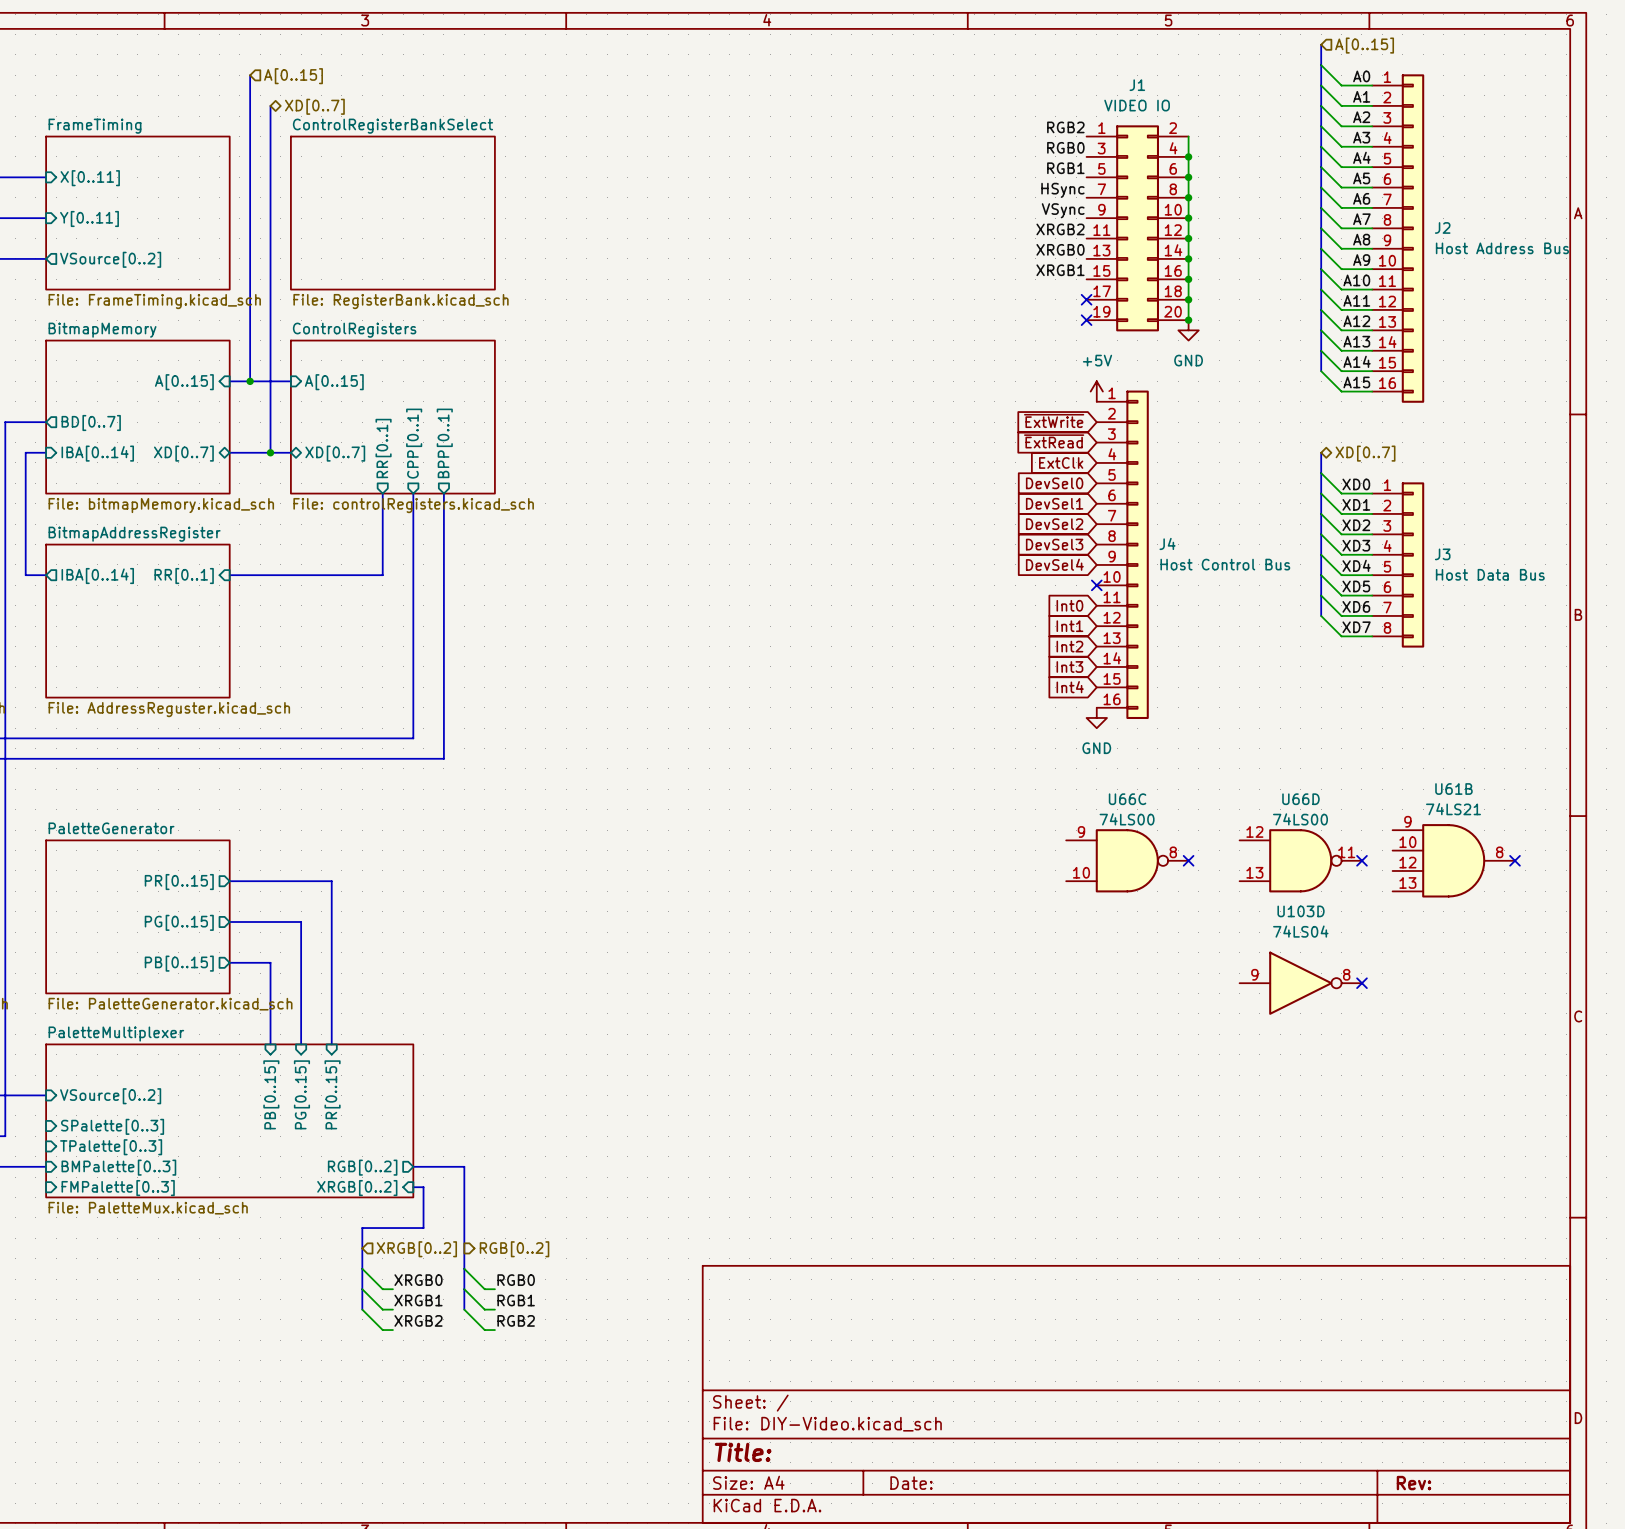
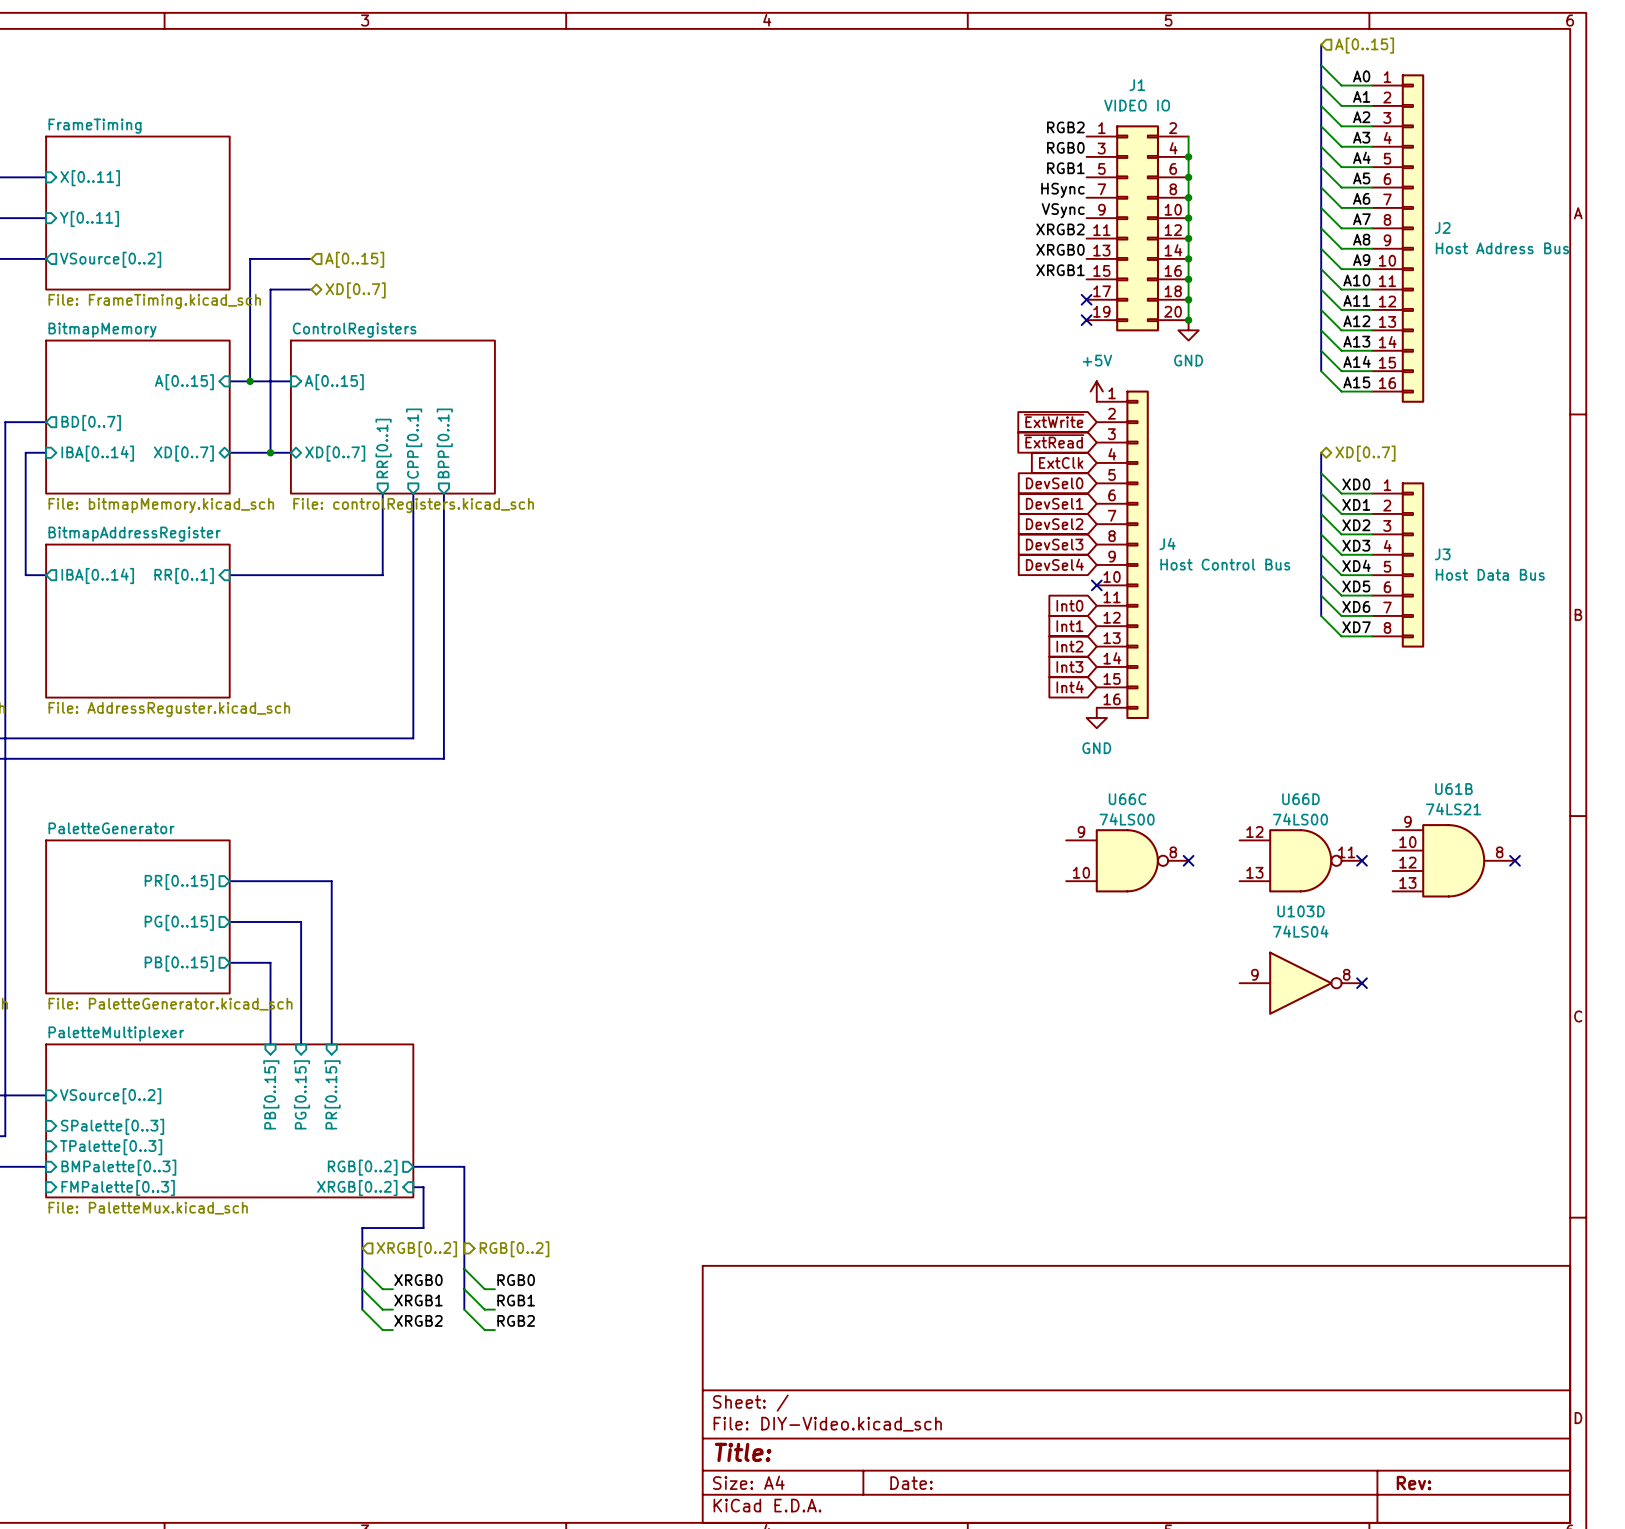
bus: (250, 75) (250, 258) -> (311, 258) (250, 258)
hierarchical label position: A[0..15] (293, 76) -> A[0..15] (354, 259)
bus: (270, 105) (270, 289) -> (311, 289) (270, 289)
hierarchical label position: XD[0..7] (314, 106) -> XD[0..7] (355, 290)
sheet ControlRegisterBankSelect: File: RegisterBank.kicad_sch (392, 213) -> none

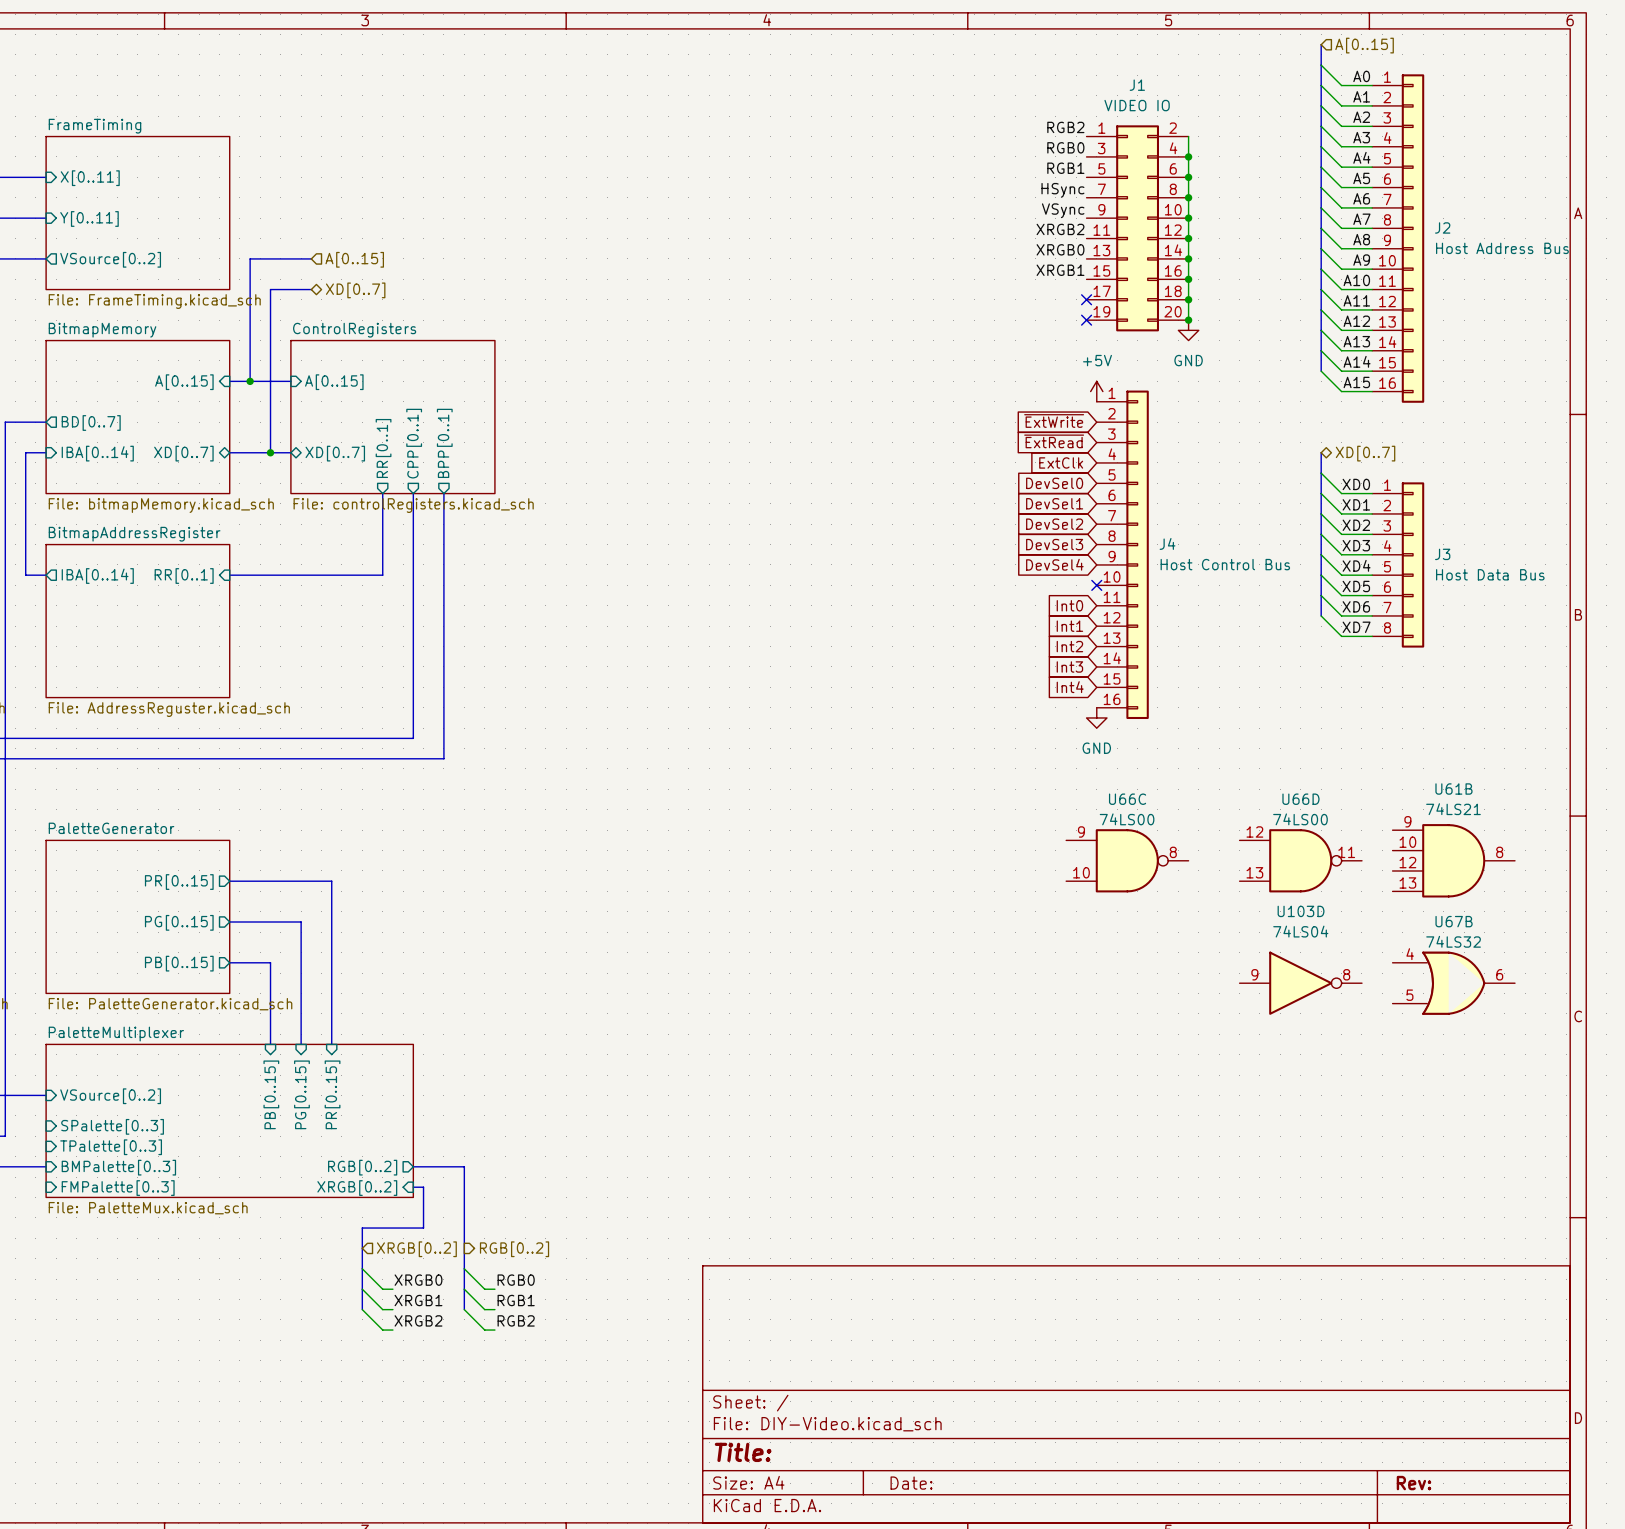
no-connect mark: (1188, 860) -> none
no-connect mark: (1361, 860) -> none
no-connect mark: (1515, 860) -> none
no-connect mark: (1361, 983) -> none
U67B: none -> 74LS32 (1453, 983)

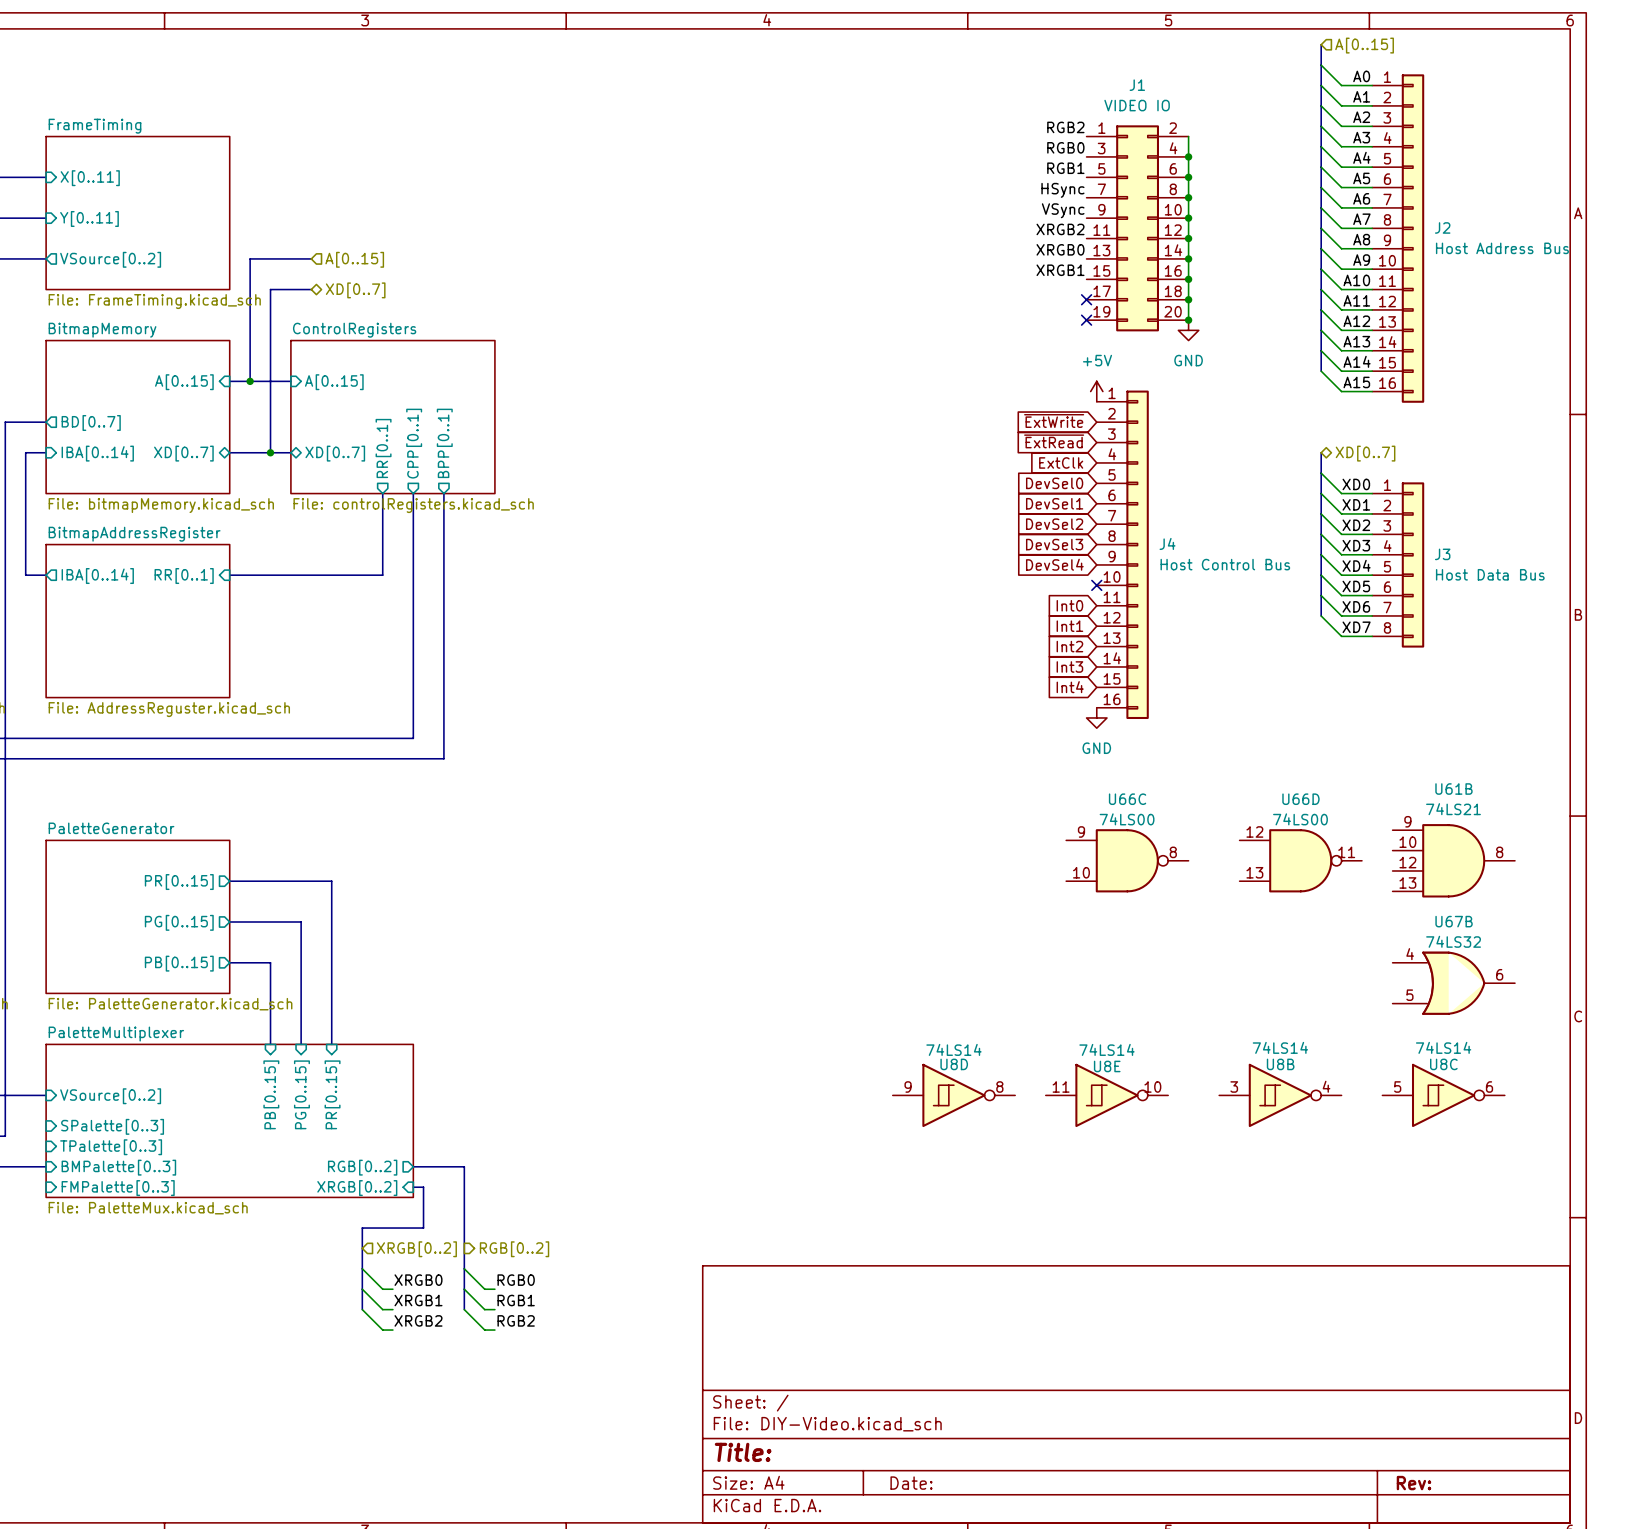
U103D: 74LS04 (1300, 983) -> none
U8D: none -> 74LS14 (953, 1095)
U8E: none -> 74LS14 (1106, 1095)
U8B: none -> 74LS14 (1280, 1095)
U8C: none -> 74LS14 (1443, 1095)

